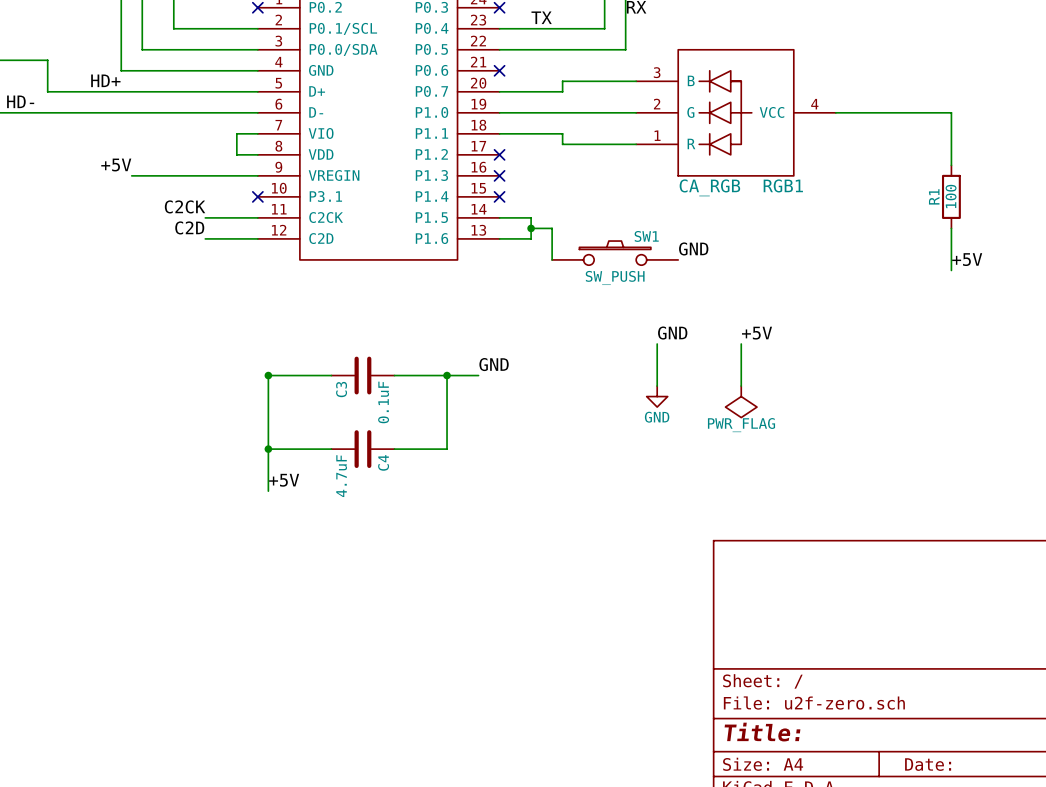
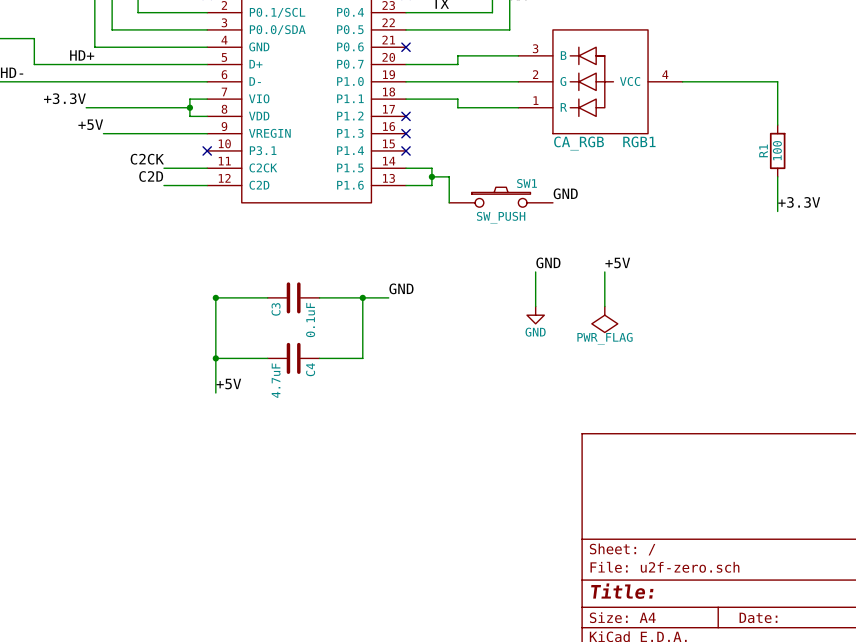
label: none -> +3.3V (64, 98)
wire: none -> (86, 107) (189, 107)
junction: none -> (189, 107)
label: +5V (967, 259) -> +3.3V (799, 202)

